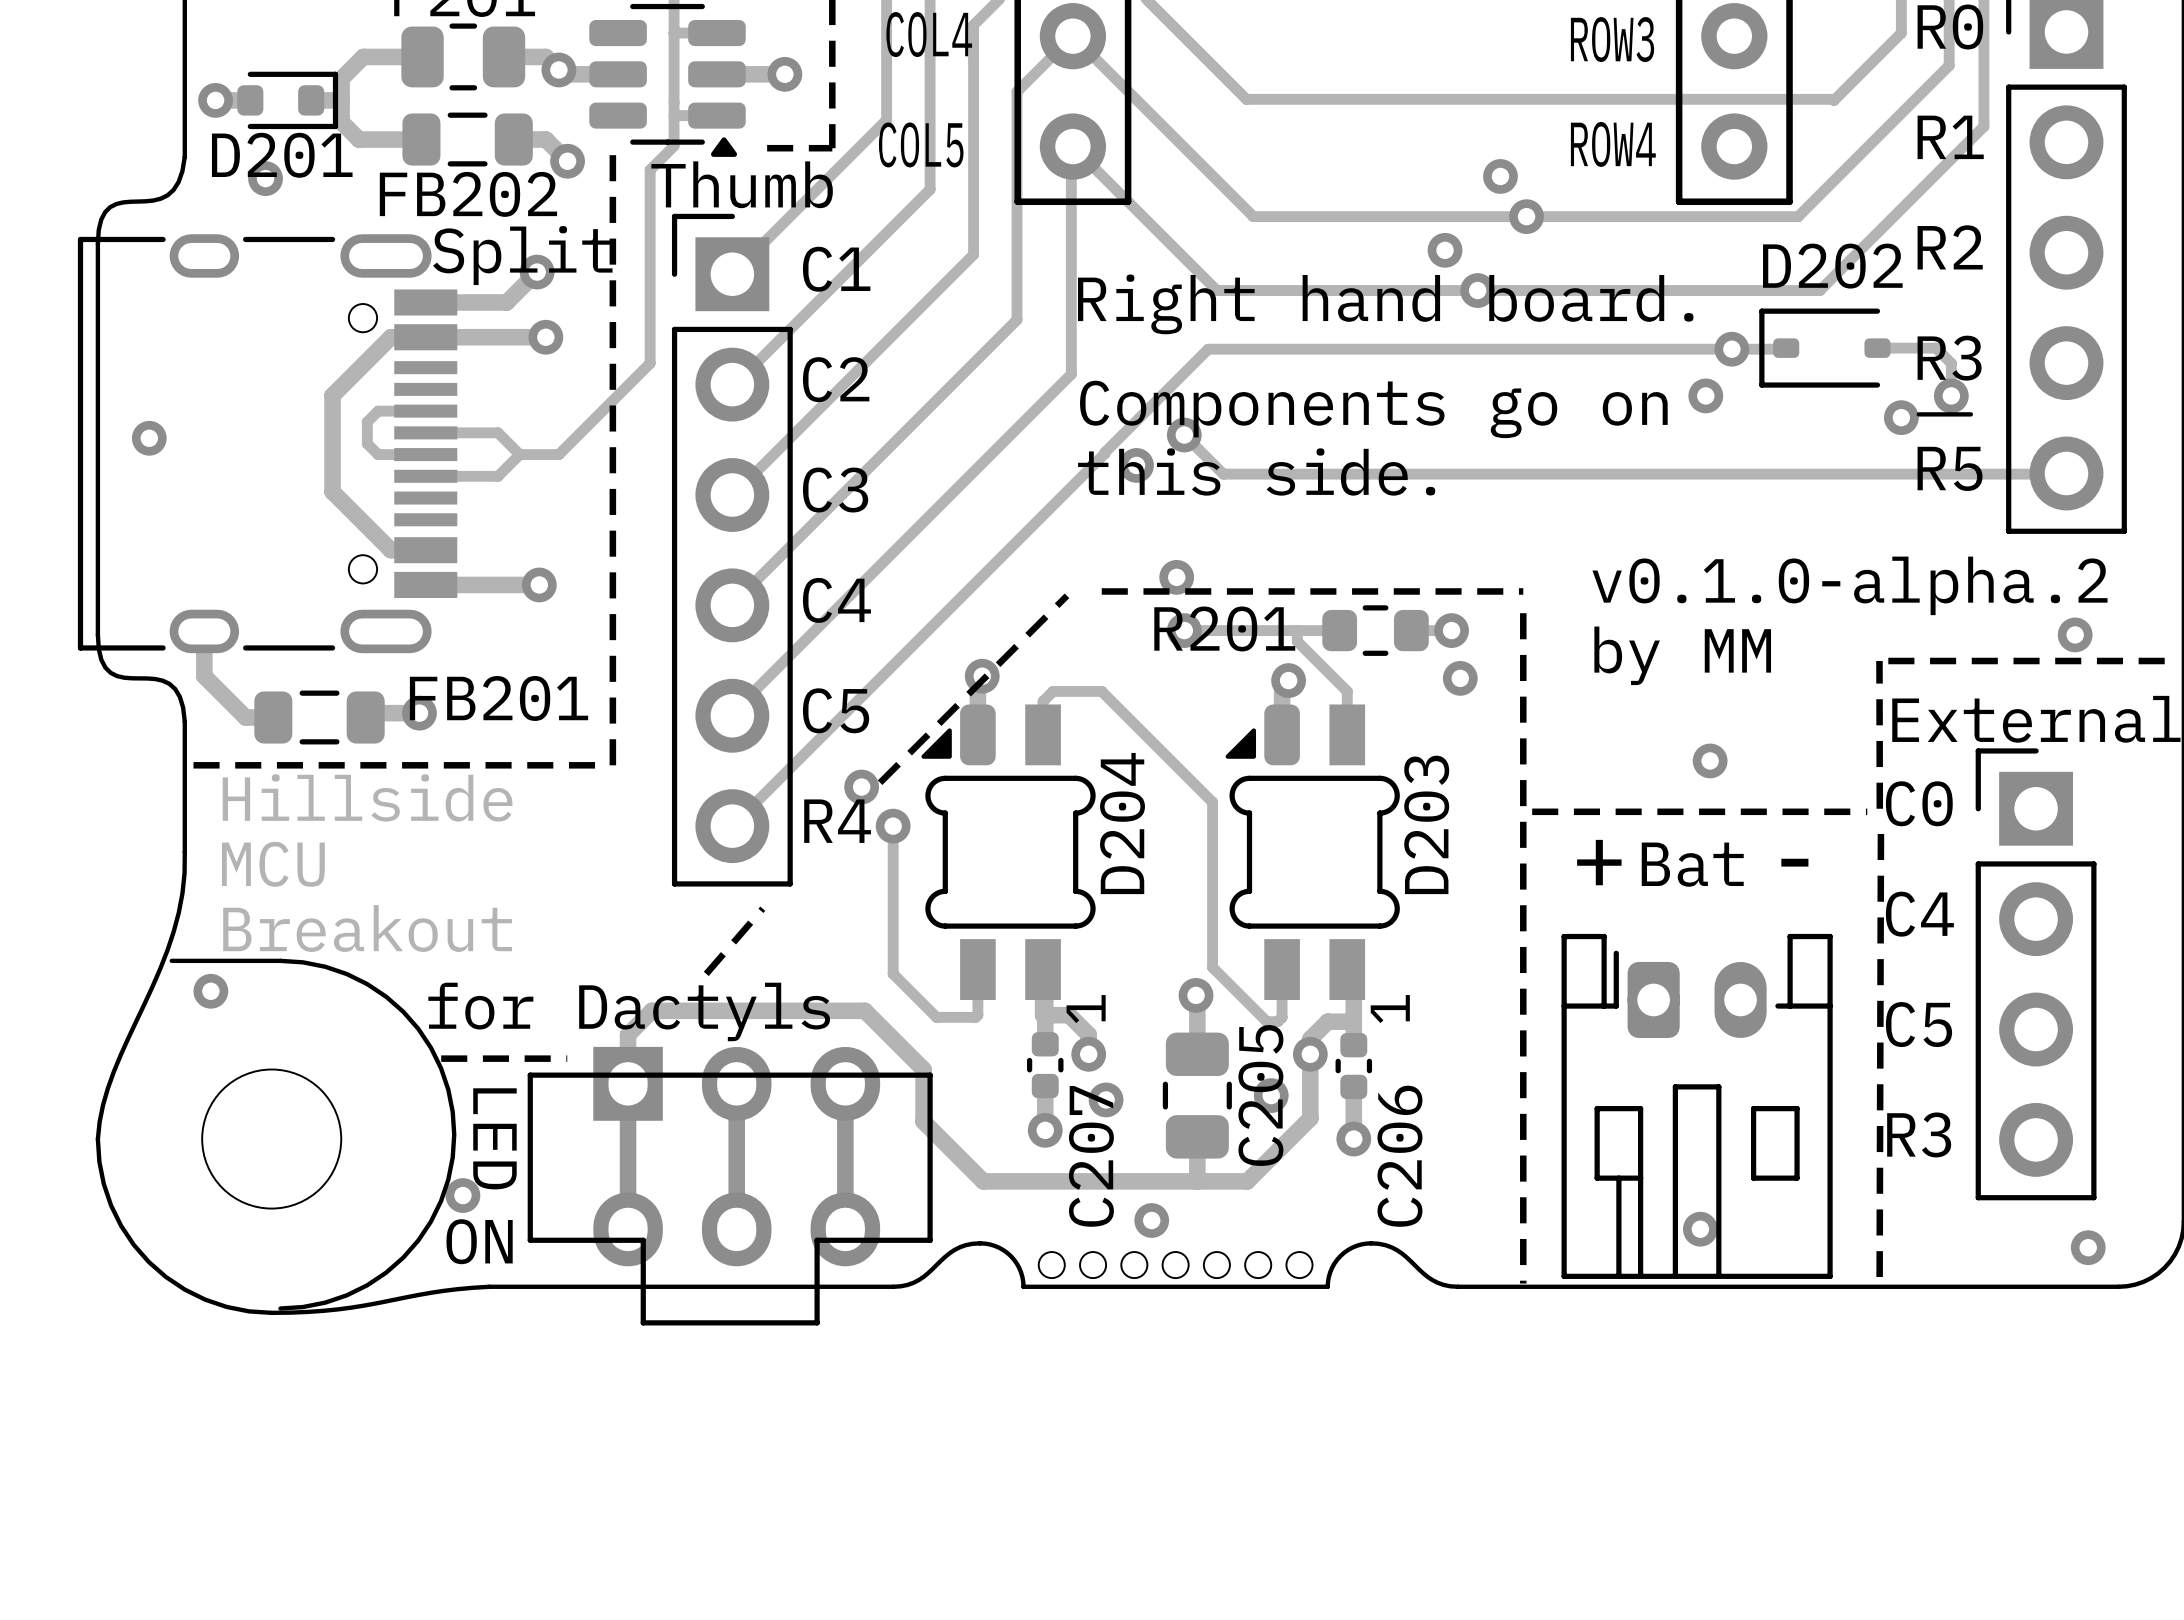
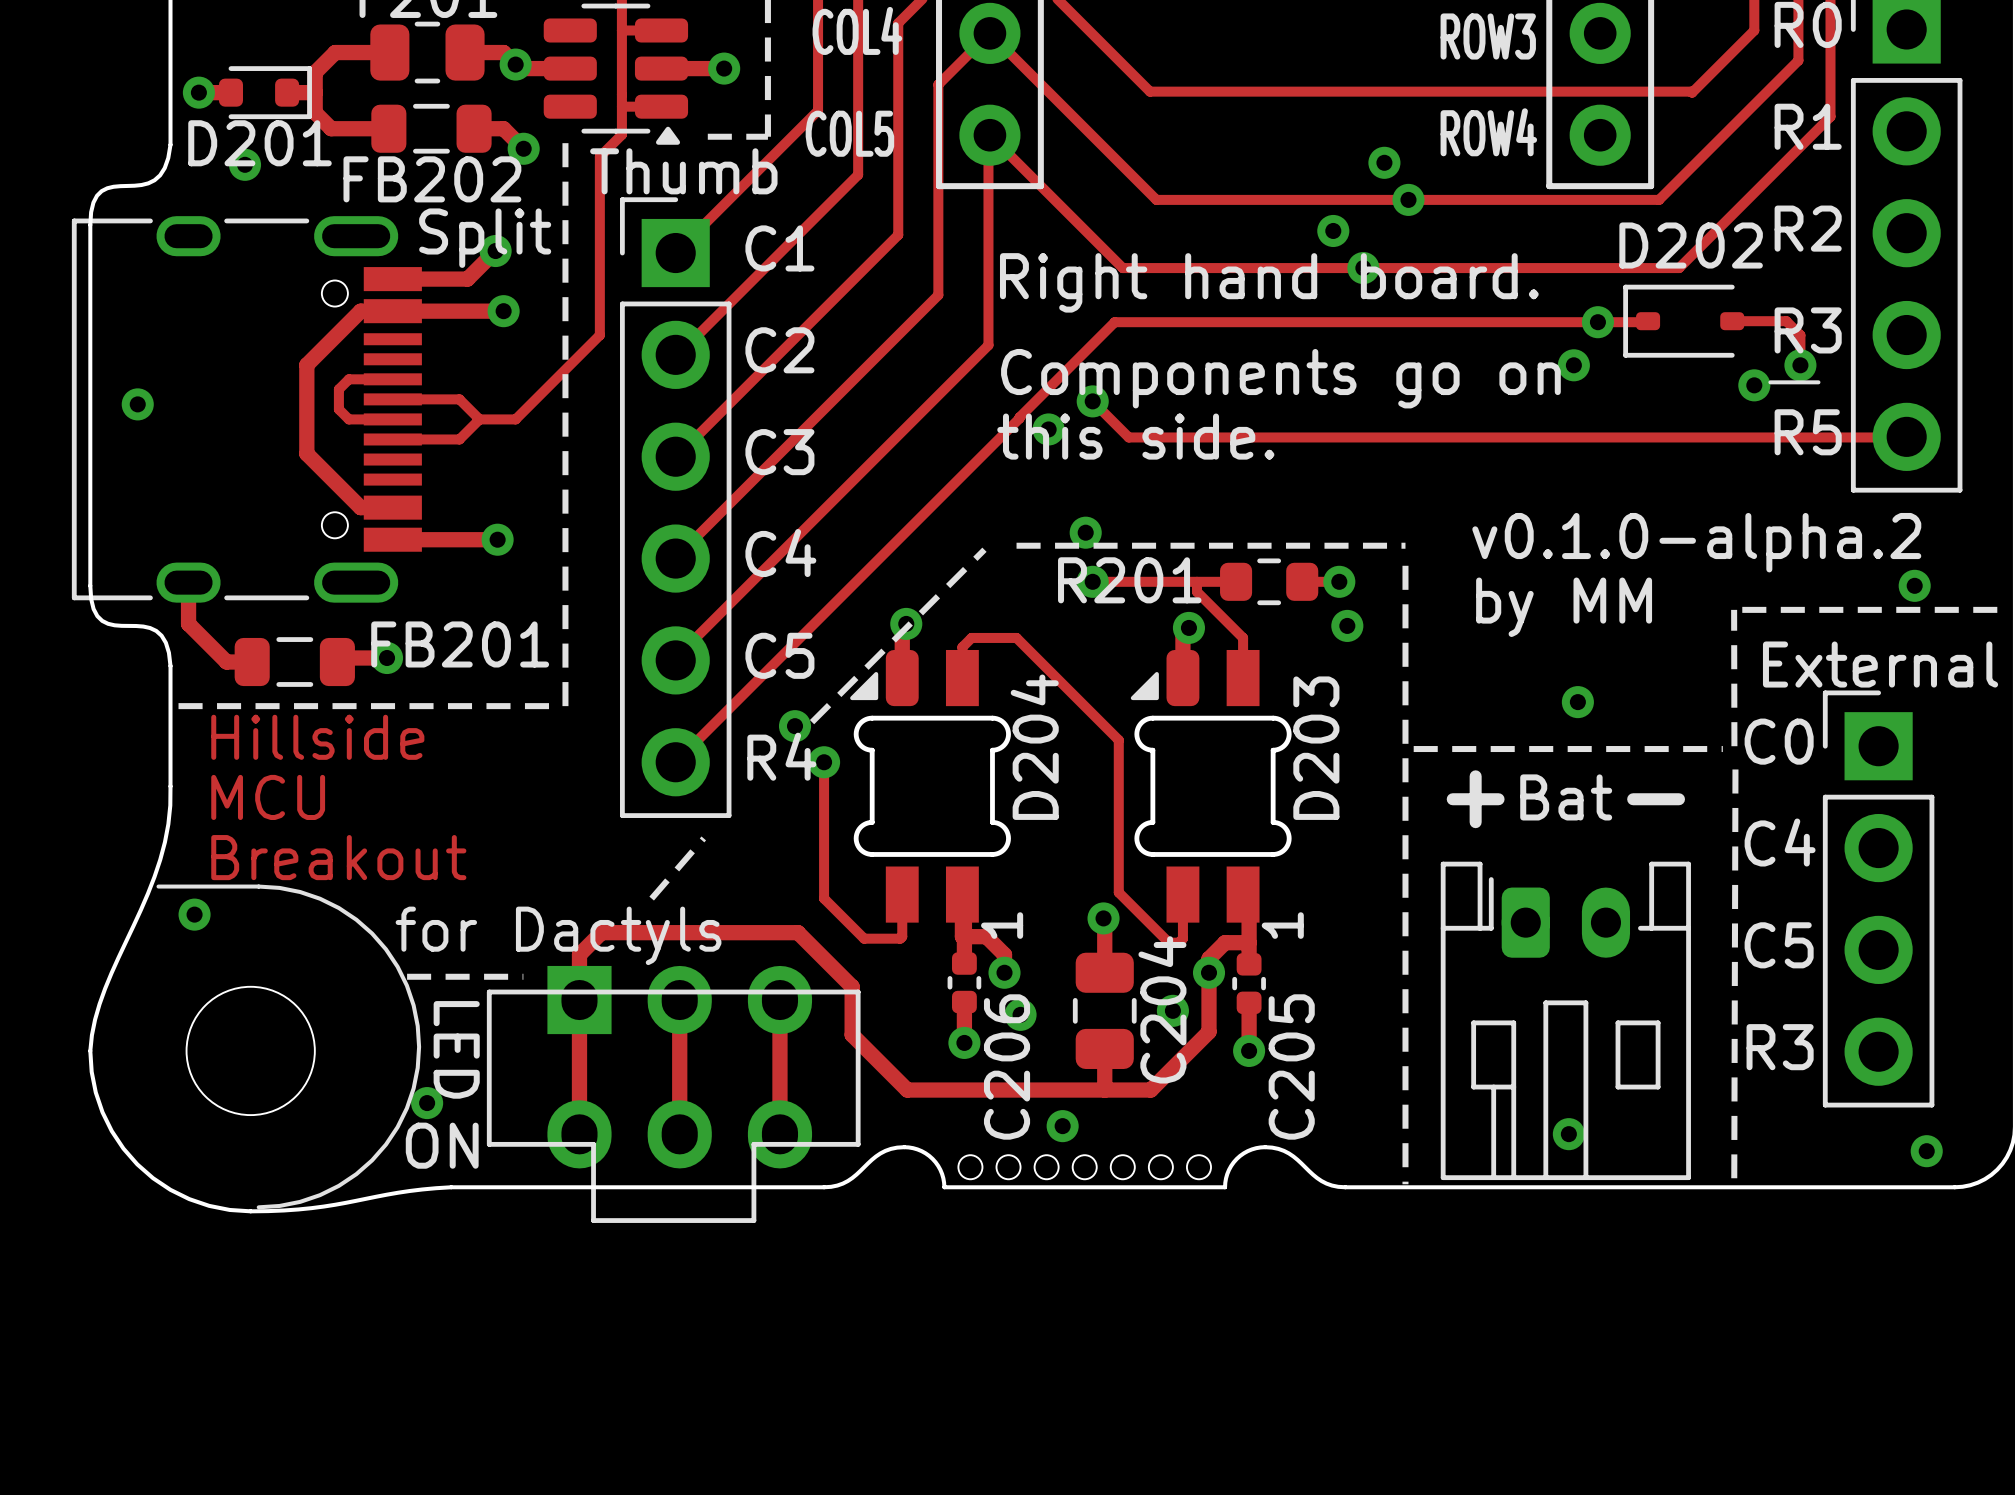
C205 name: C205 (1260, 1095) -> C204 (1162, 1009)
C207 name: C207 (1091, 1156) -> C206 (1007, 1066)
C206 name: C206 (1399, 1156) -> C205 (1291, 1066)

